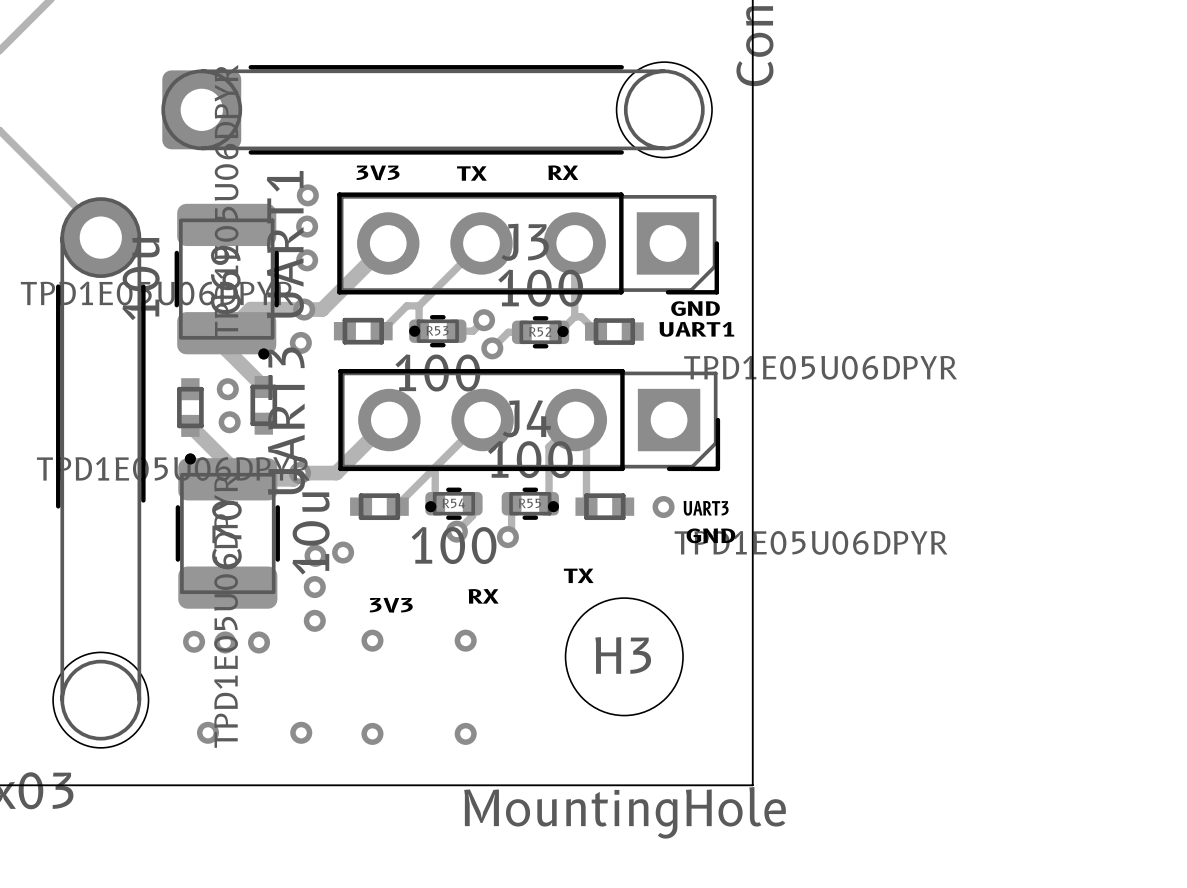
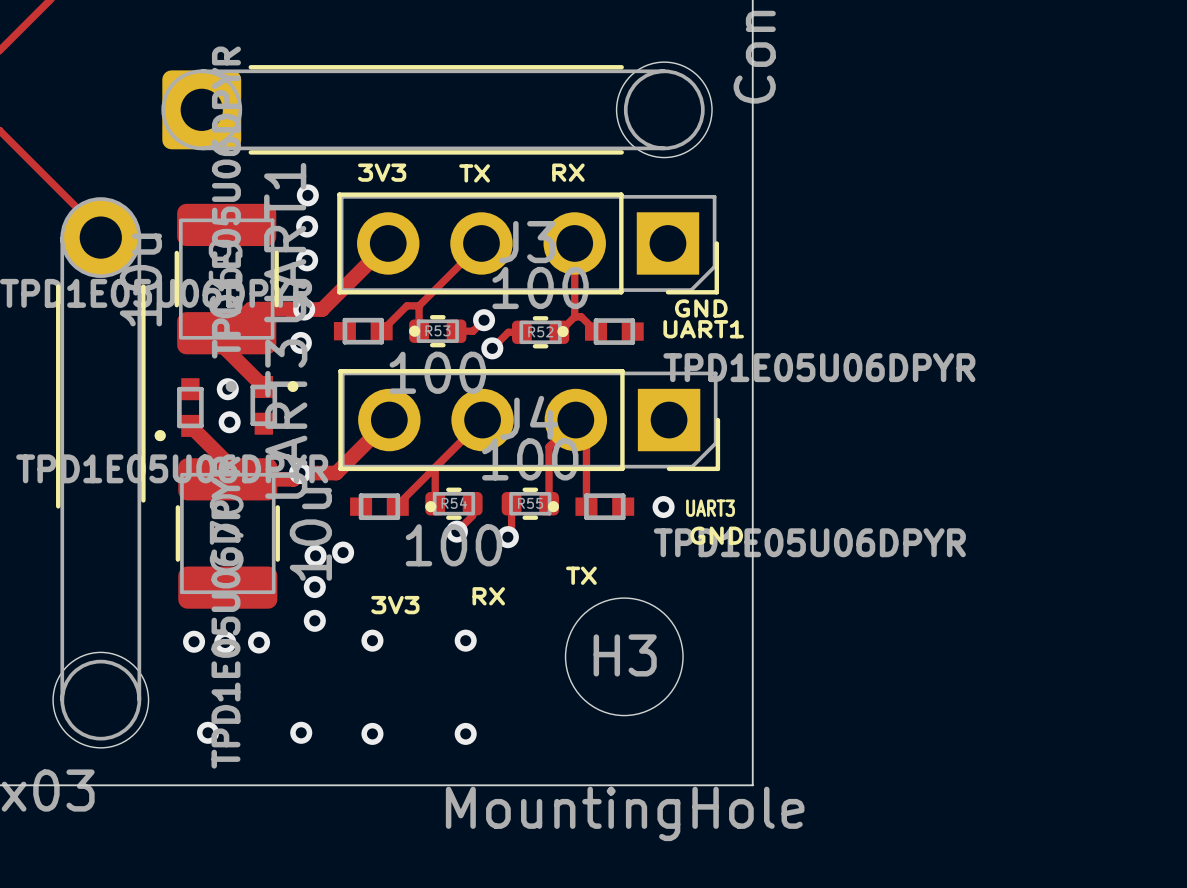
part footprint: [250, 348, 278, 435] -> [225, 375, 299, 435]
part footprint: [177, 378, 204, 465] -> [154, 378, 204, 442]

